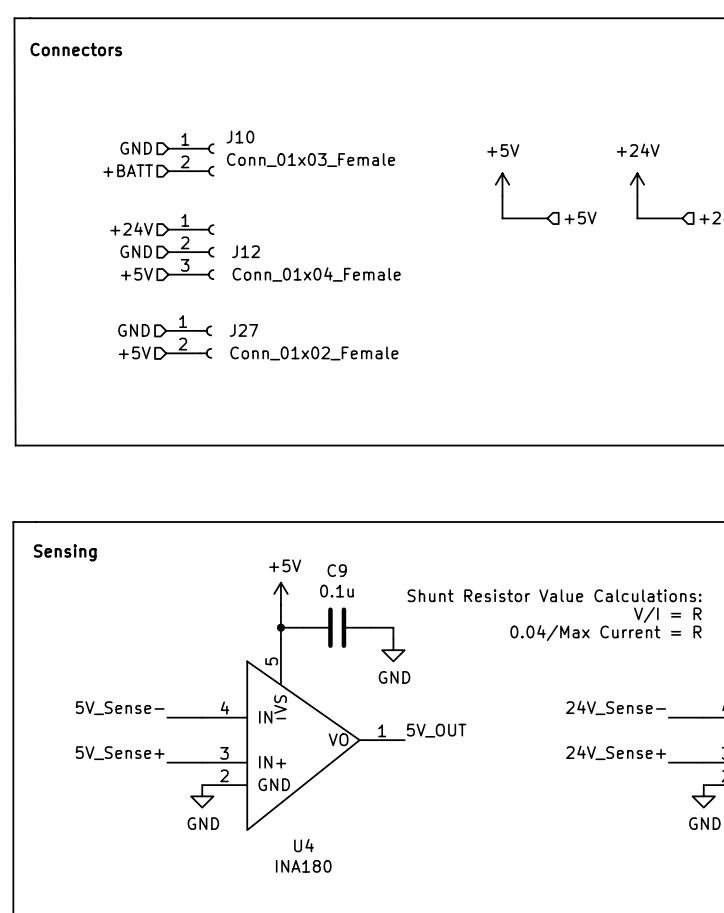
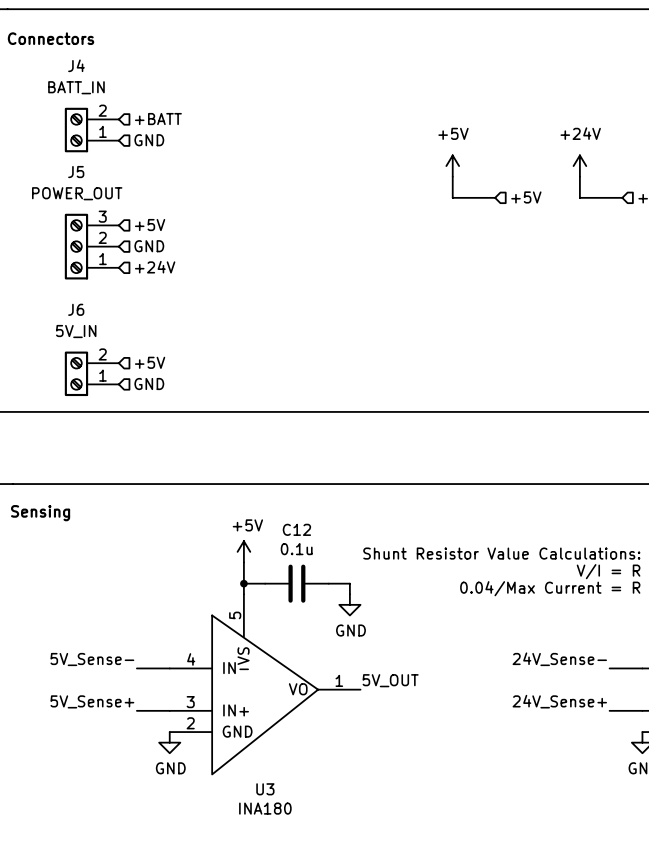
J4: none -> BATT_IN (91, 130)
hierarchical label rotation: 0° (136, 148) -> 180° (149, 140)
hierarchical label position: GND (136, 148) -> GND (149, 140)
J10: Conn_01x03_Female (191, 159) -> none
hierarchical label rotation: 0° (128, 170) -> 180° (158, 119)
hierarchical label position: +BATT (128, 170) -> +BATT (158, 119)
hierarchical label rotation: 0° (131, 228) -> 180° (155, 267)
hierarchical label position: +24V (131, 228) -> +24V (155, 267)
hierarchical label rotation: 0° (136, 251) -> 180° (149, 246)
hierarchical label position: GND (136, 251) -> GND (149, 246)
J12: Conn_01x04_Female (191, 252) -> none
J5: none -> POWER_OUT (91, 246)
hierarchical label rotation: 0° (137, 274) -> 180° (150, 225)
hierarchical label position: +5V (137, 274) -> +5V (150, 225)
hierarchical label: GND (133, 330) -> none
J27: Conn_01x02_Female (189, 342) -> none
hierarchical label rotation: 0° (134, 352) -> 180° (150, 362)
hierarchical label position: +5V (134, 352) -> +5V (150, 362)
J6: none -> 5V_IN (91, 373)
hierarchical label: none -> GND (149, 384)
C9 name: C9 (337, 570) -> C12 (296, 529)
U4 name: U4 (303, 845) -> U3 (265, 789)

